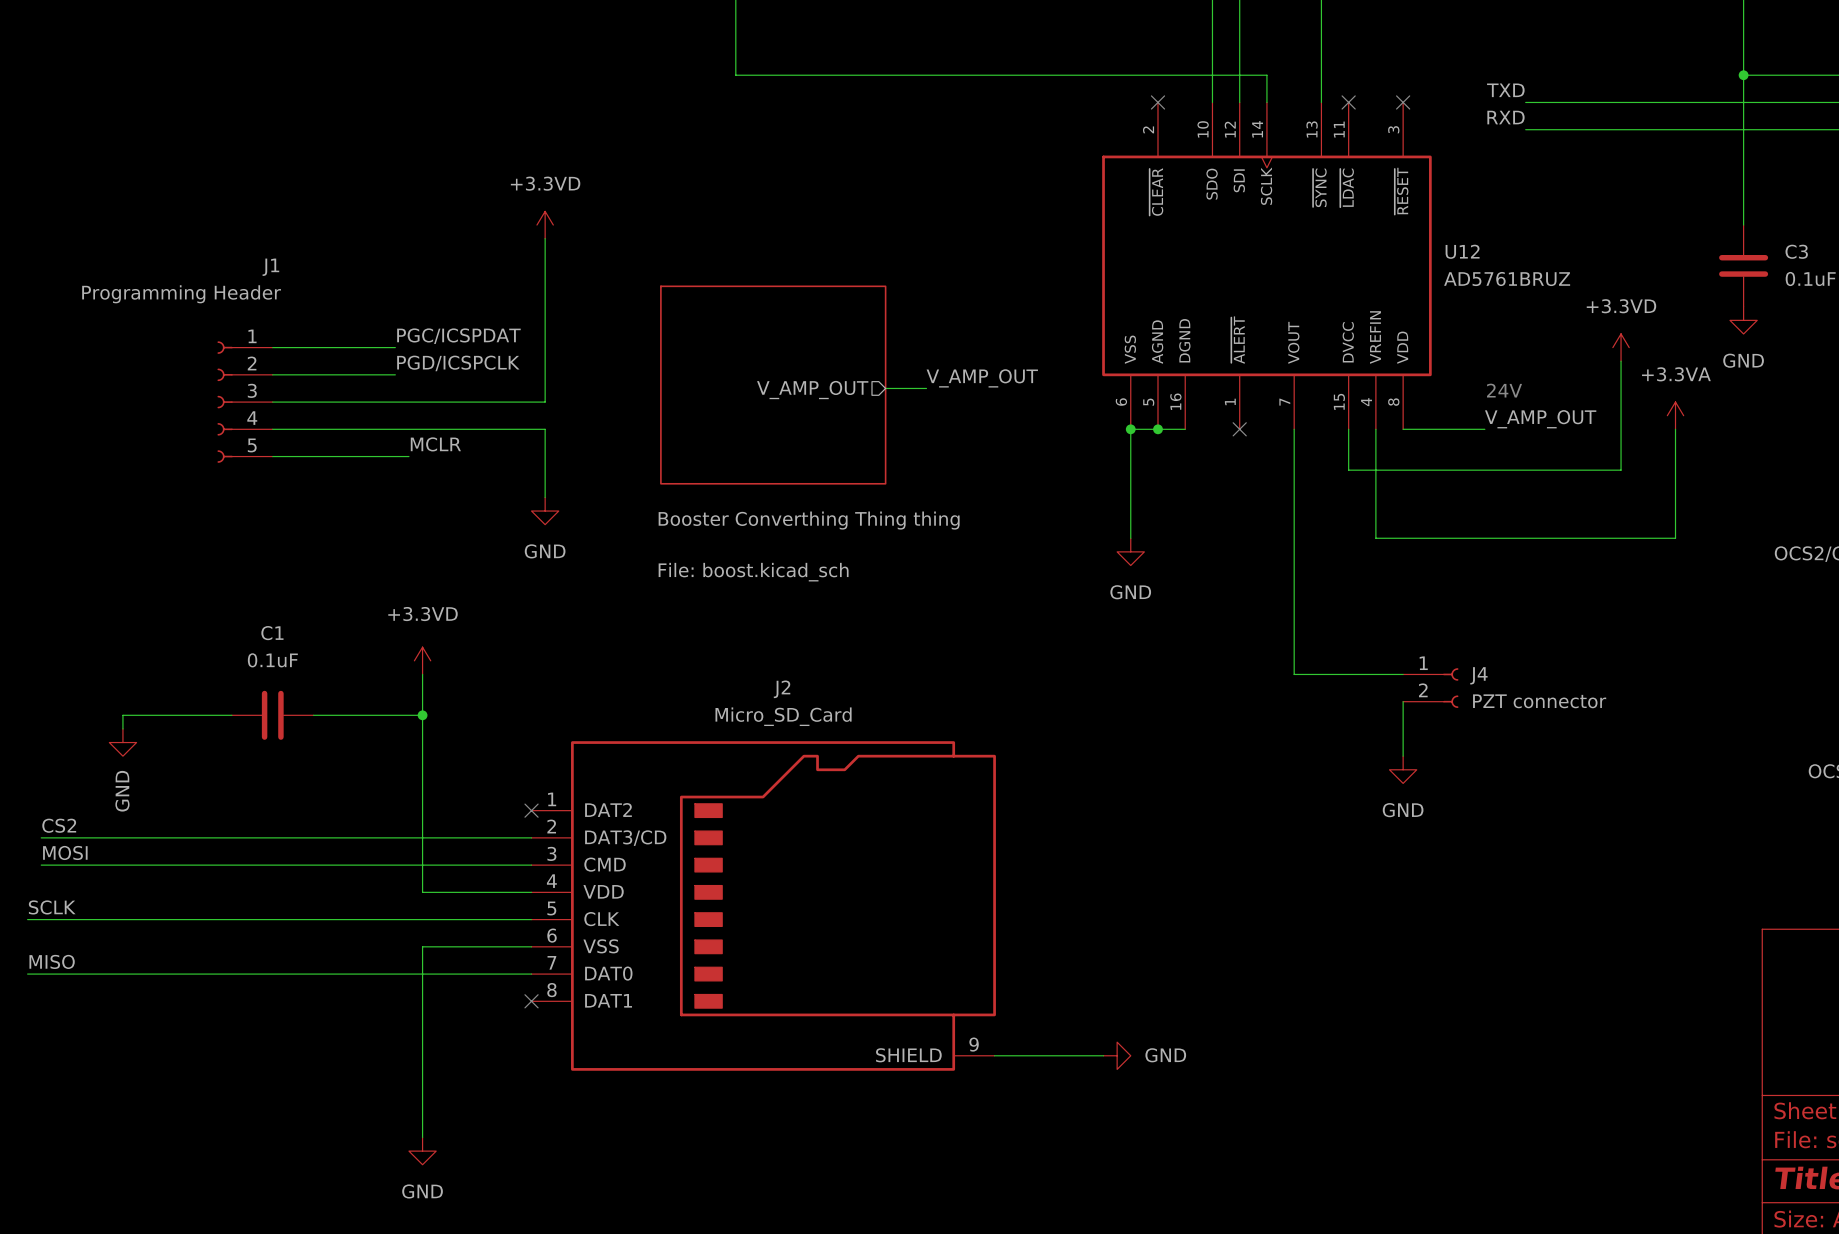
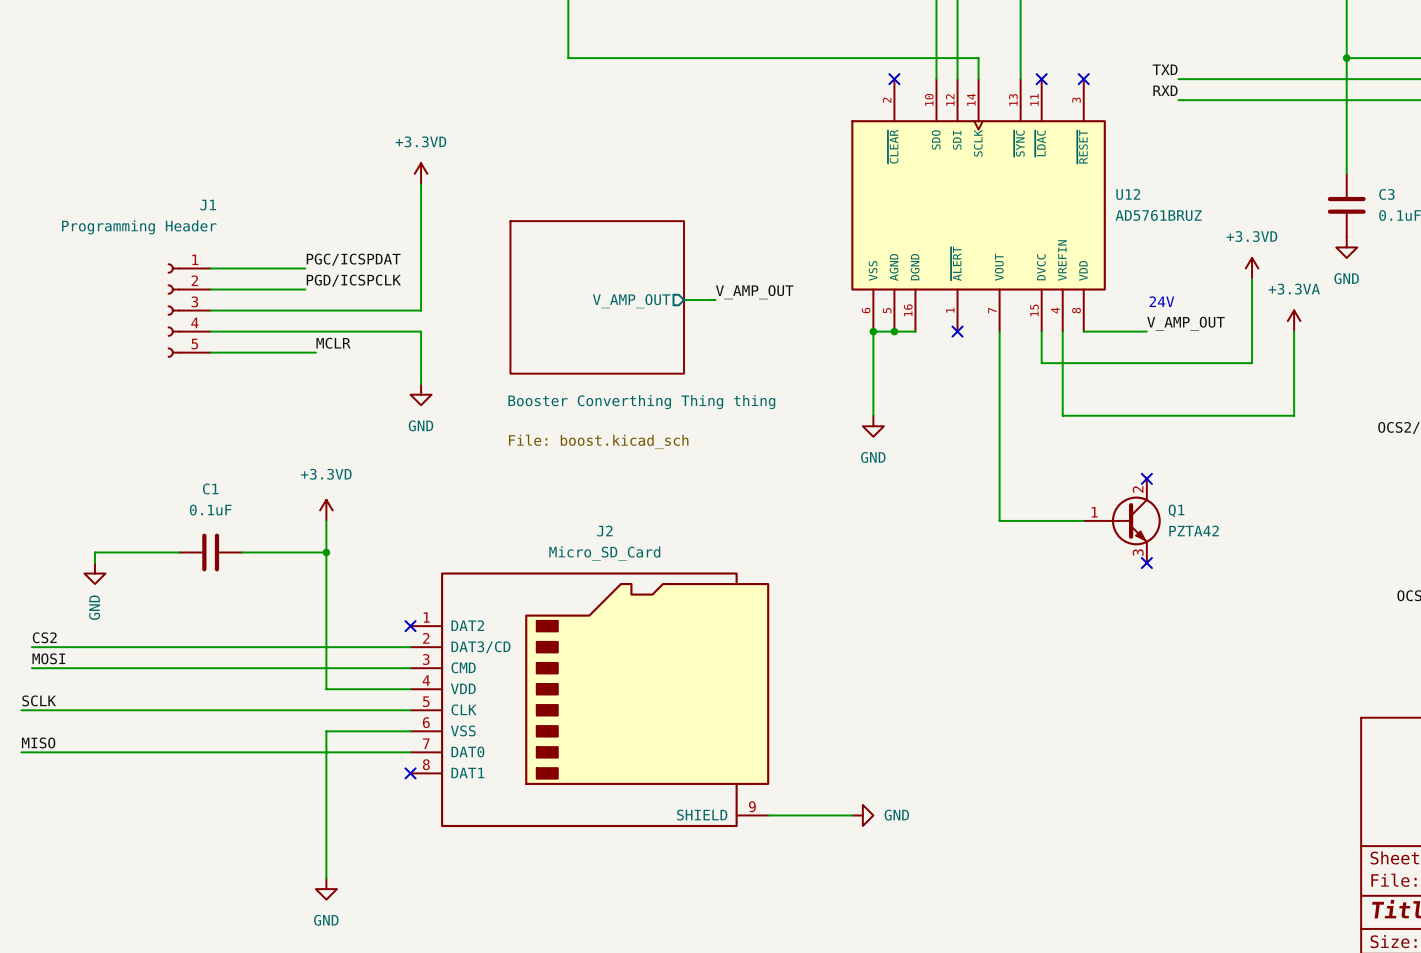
no-connect mark: none -> (1146, 478)
Q1: none -> PZTA42 (1122, 520)
J4: PZT connector (1430, 688) -> none
wire: (1403, 701) (1403, 756) -> none
no-connect mark: none -> (1146, 563)
power symbol: GND (1403, 769) -> none

